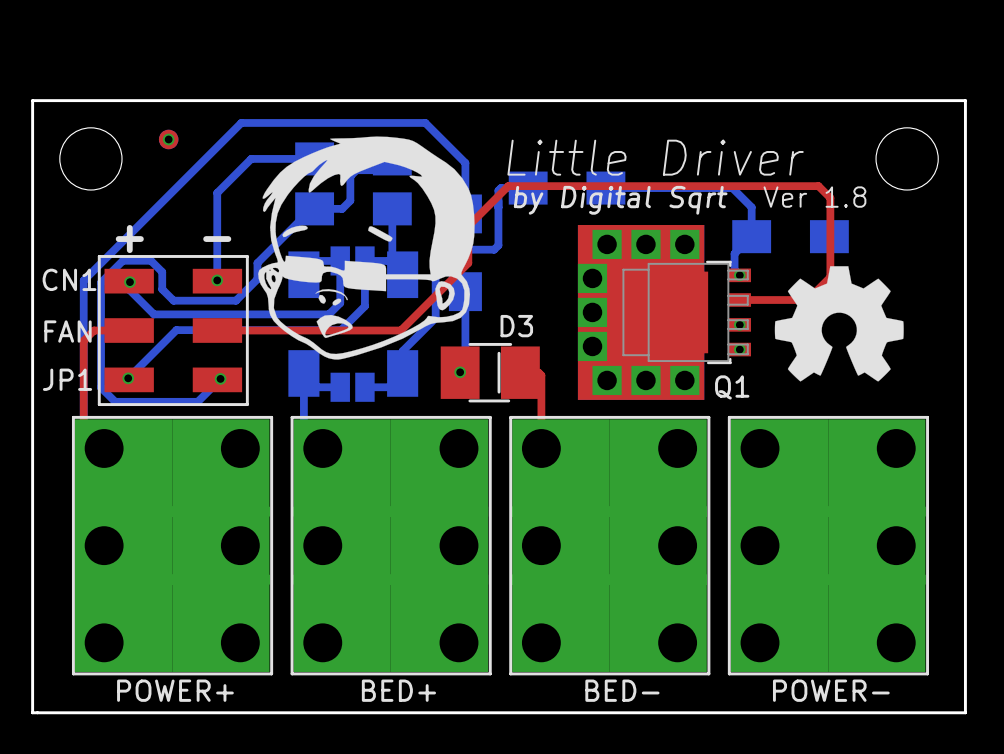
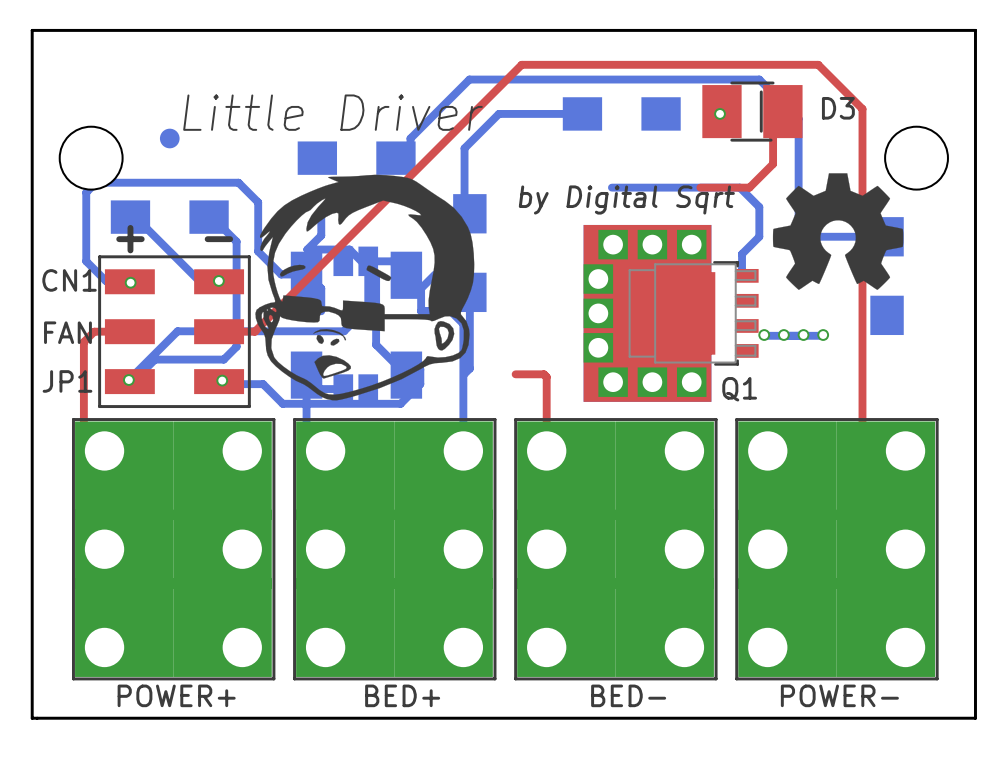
board edge: (32, 100) (965, 100) -> (32, 99) (32, 30) (975, 30) (975, 99)
top track: none -> (773, 111) (773, 164) (749, 187) (700, 187)
bottom track: none -> (582, 113) (498, 113) (464, 148) (464, 300) (453, 311) (421, 311) (421, 288) (435, 274)
via: none -> (720, 113)
part: (168, 139) -> none
via: (168, 139) -> none
bottom track: none -> (410, 153) (410, 138) (469, 79) (759, 79) (798, 118) (798, 235) (887, 236)
text position: Little Driver (655, 157) -> Little Driver (332, 112)
bottom track: (392, 158) (389, 158) (378, 170) (356, 170) (350, 176) (350, 200) (342, 208) (302, 208) -> none
bottom track: (314, 160) (314, 158) (251, 158) (217, 192) (217, 280) -> (130, 217) (135, 217) (199, 280) (218, 280)
bottom track: (528, 188) (500, 188) (498, 190) (498, 245) (494, 249) (447, 249) (435, 261) (435, 318) (402, 351) (402, 373) (388, 387) (364, 387) -> none
part position: (567, 188) -> (621, 113)
text: Ver 1.8 (814, 197) -> none
bottom track: (311, 208) (257, 263) (257, 279) (235, 300) (173, 300) (162, 289) (162, 272) (150, 260) (122, 260) (101, 282) (101, 387) (115, 401) (197, 401) (220, 378) -> none
part: (353, 208) -> none
bottom track: (392, 208) (392, 264) -> none
bottom track: none -> (321, 211) (321, 235) (307, 249) (349, 249) (376, 276) (376, 344) (400, 369) (420, 369) (420, 384) (400, 403) (282, 403) (263, 384) (223, 384)
bottom track: (465, 213) (465, 163) (425, 122) (241, 122) (83, 280) (83, 428) (104, 448) -> none
part: none -> (169, 217)
bottom track: none -> (209, 217) (212, 217) (236, 241) (236, 346) (223, 359) (155, 359) (135, 379)
part rotation: 0° (790, 236) -> 90° clockwise (887, 276)
part position: (790, 236) -> (887, 276)
drawing position: (366, 248) -> (364, 287)
bottom track: (303, 274) (317, 260) (340, 260) (340, 303) (328, 314) (153, 314) (129, 290) (129, 282) -> none
via: (739, 275) -> none
bottom track: none -> (130, 280) (105, 280) (86, 261) (86, 192) (96, 182) (238, 182) (258, 202) (258, 251) (281, 274) (307, 274) (321, 288) (321, 311)
top track: (739, 300) (807, 300) (830, 277) (830, 197) (818, 186) (508, 186) (468, 226) (468, 263) (400, 330) (252, 330) -> (905, 549) (862, 506) (862, 109) (818, 64) (521, 64) (254, 331)
bottom track: none -> (450, 311) (463, 324) (463, 450)
drawing position: (839, 323) -> (838, 231)
via: (739, 324) -> none
D3 name position: D3 (516, 326) -> D3 (838, 108)
bottom track: none -> (764, 335) (823, 335)
via: none -> (764, 335)
via: none -> (783, 335)
via: none -> (803, 335)
via: none -> (823, 335)
via: (739, 349) -> none
via: (460, 372) -> none
D3 position: (490, 372) -> (752, 111)

